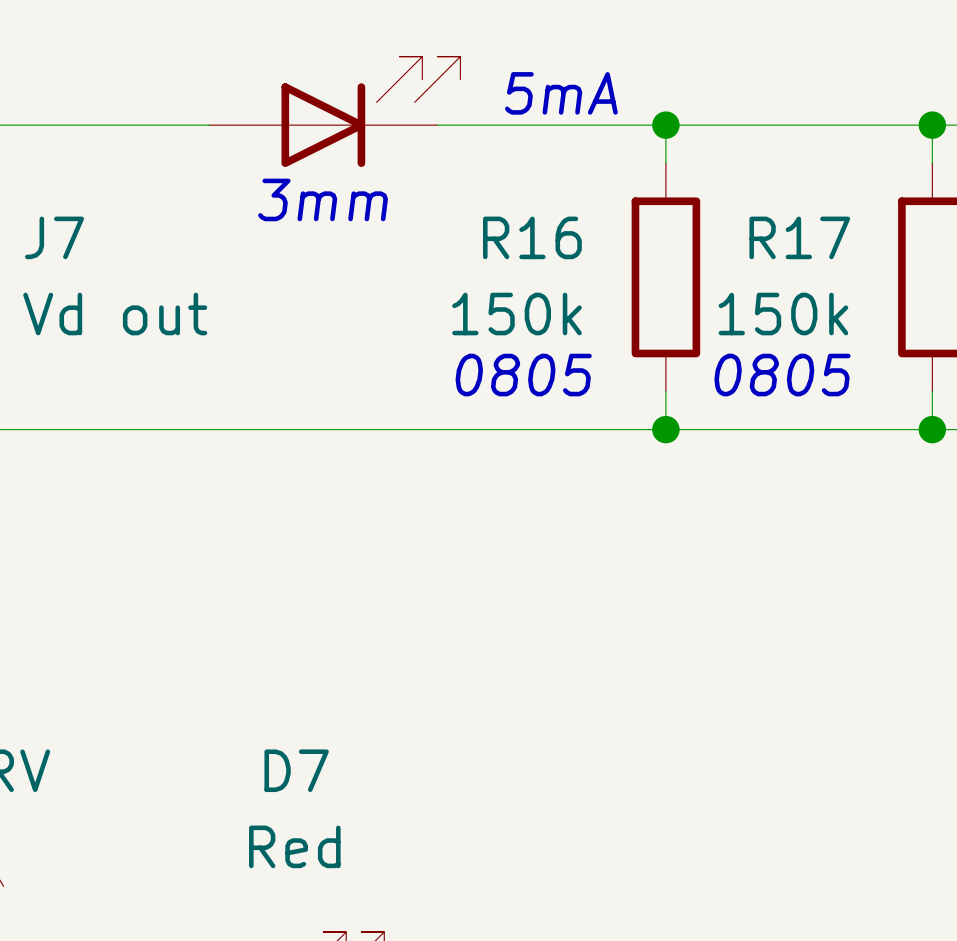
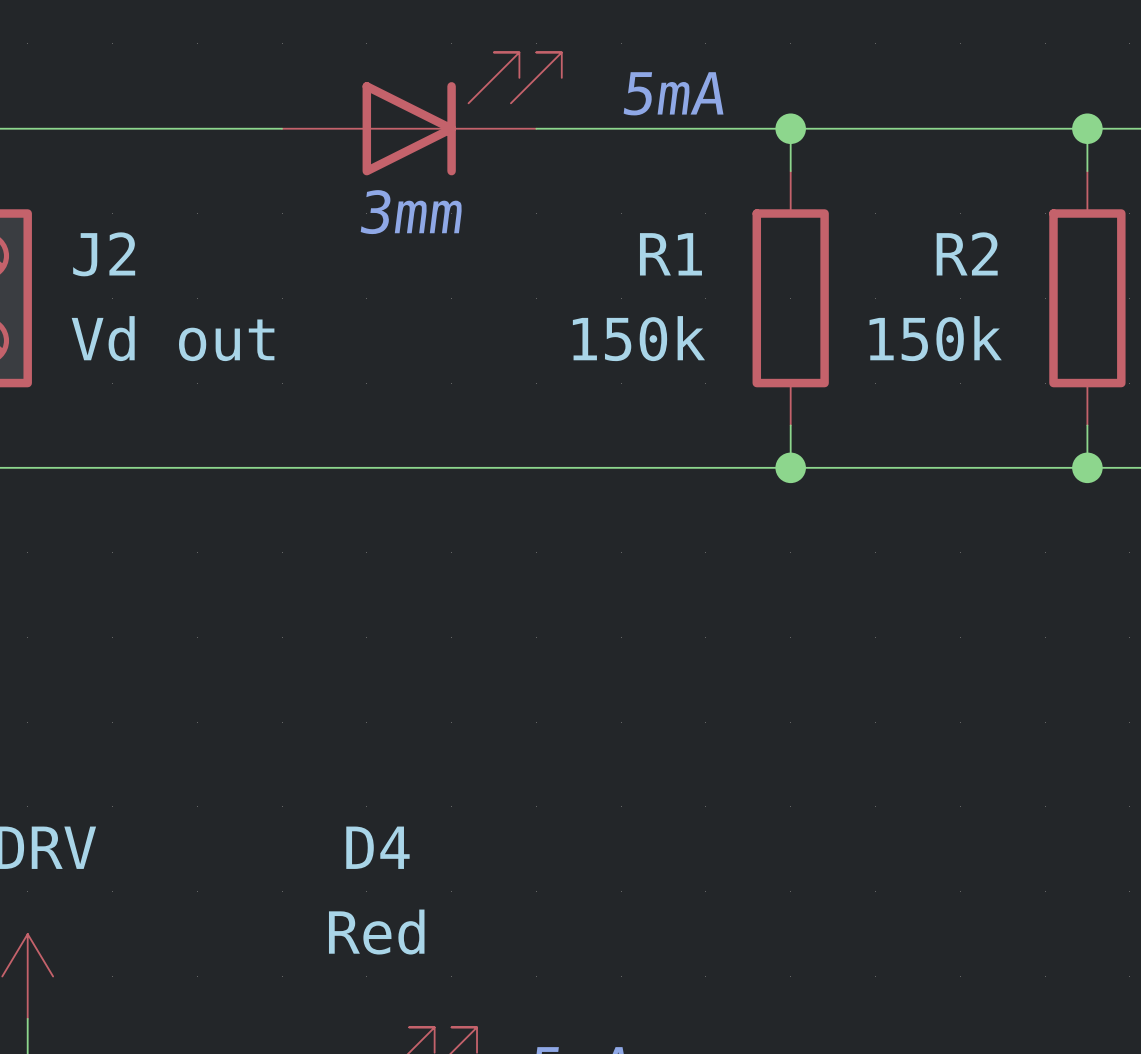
J7 name: J7 (54, 237) -> J2 (104, 254)
R16 name: R16 (532, 237) -> R1 (670, 254)
R17 name: R17 (799, 237) -> R2 (967, 253)
text: 0805 (523, 375) -> none
text: 0805 (782, 375) -> none
D7 name: D7 (296, 770) -> D4 (377, 847)

